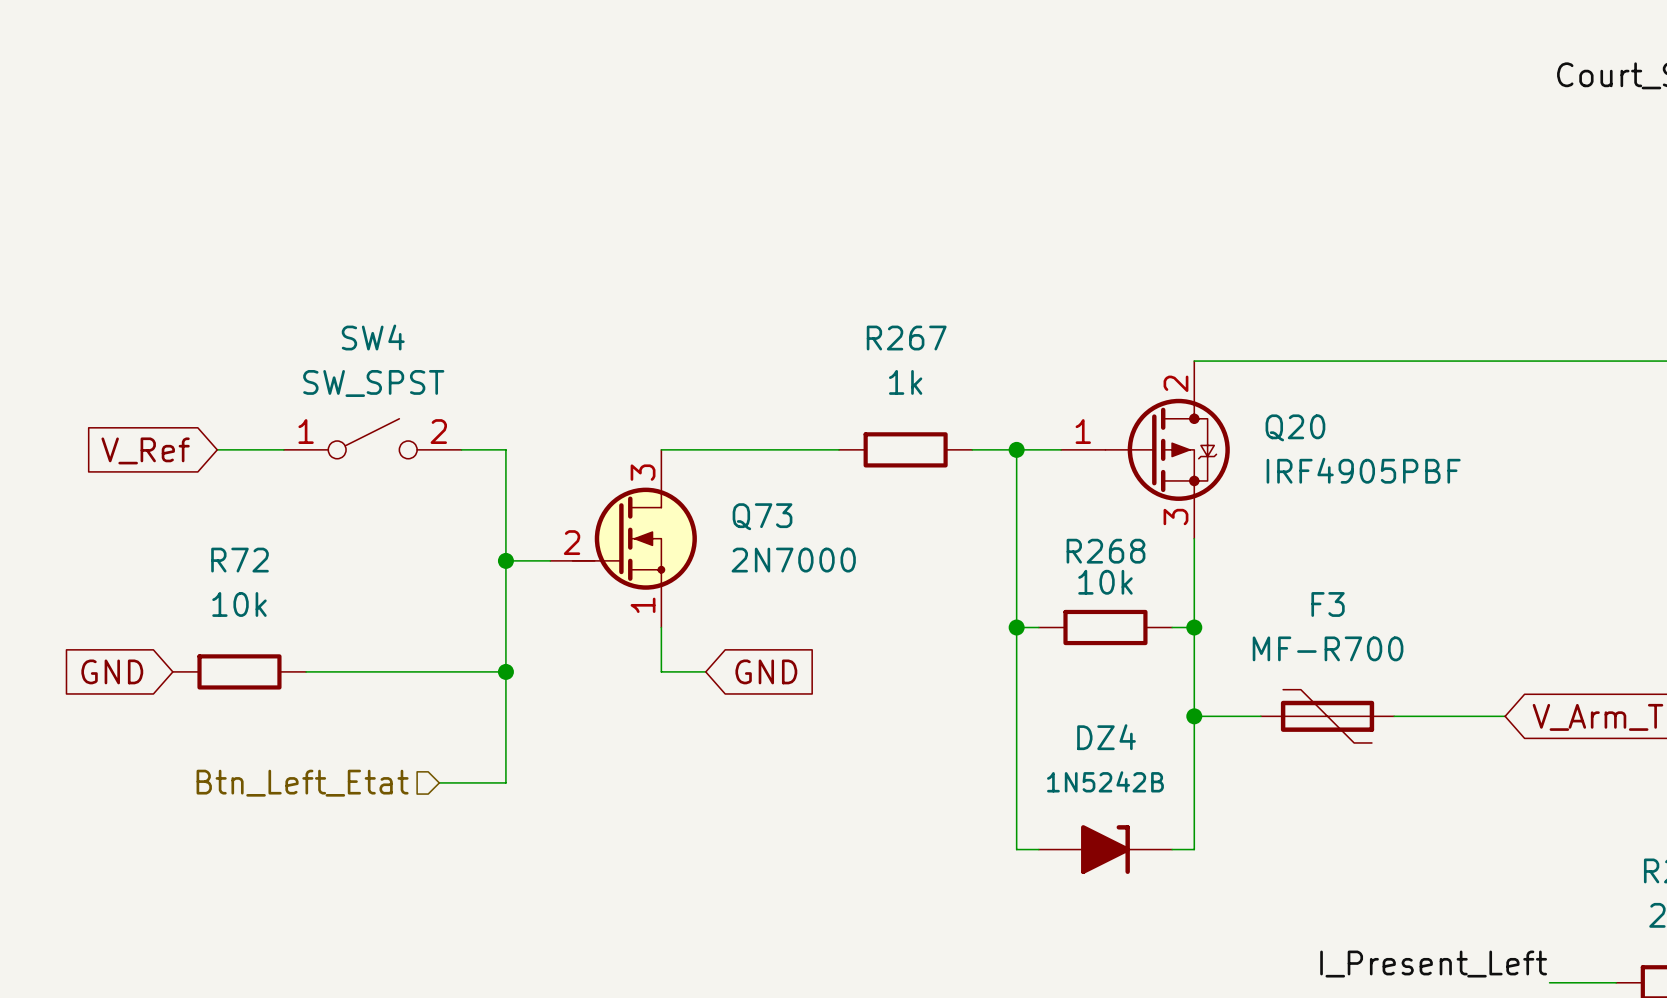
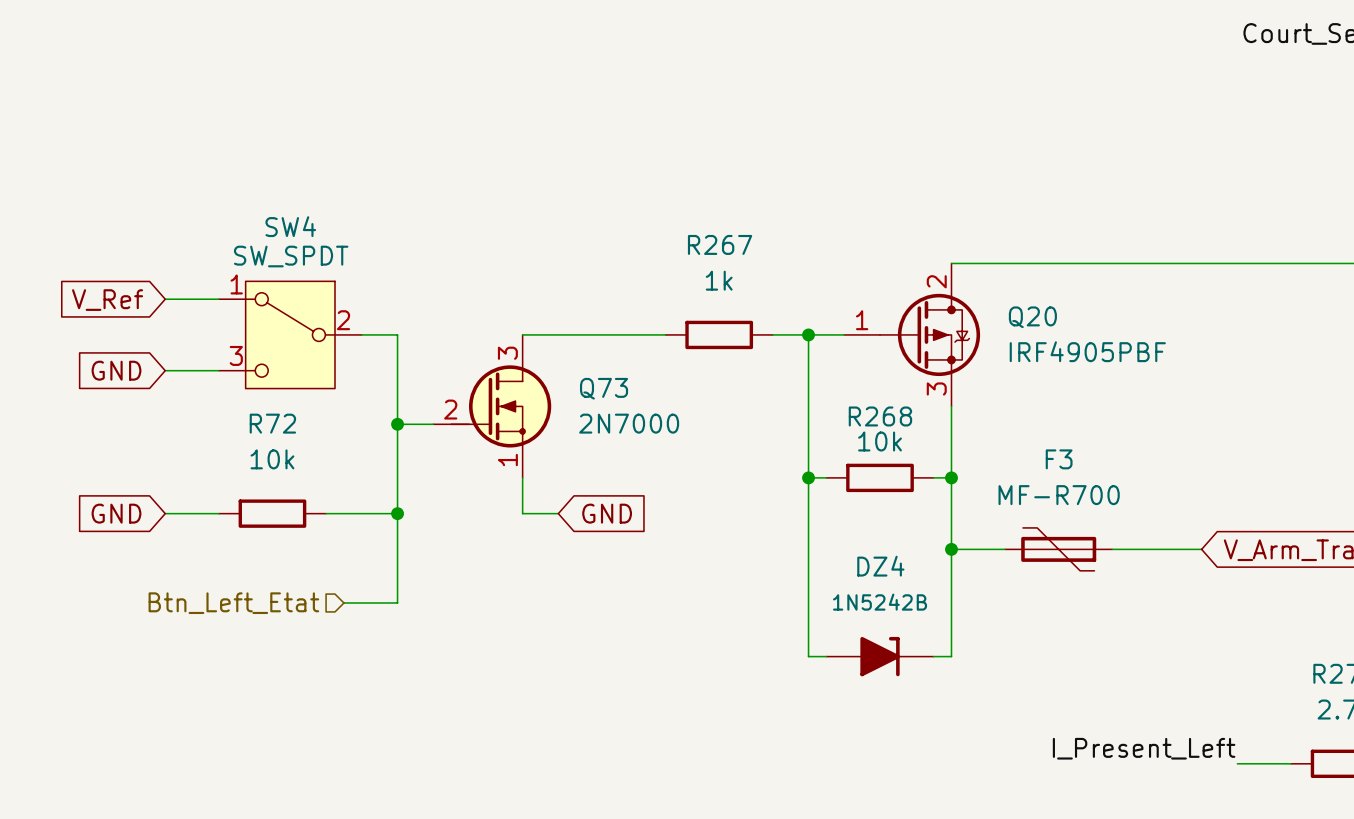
SW4 value: SW_SPST (373, 383) -> SW_SPDT (291, 256)
SW4 symbol: [283, 418, 462, 459] -> [218, 281, 362, 389]
wire: (217, 449) (283, 449) -> (165, 299) (218, 299)
global label position: V_Ref (145, 450) -> V_Ref (107, 300)
global label: none -> GND (116, 370)
wire: none -> (165, 370) (218, 370)
global label position: GND (112, 671) -> GND (116, 513)
wire: none -> (165, 513) (218, 513)
R72 position: (239, 671) -> (272, 513)
wire: (306, 671) (417, 671) -> none

